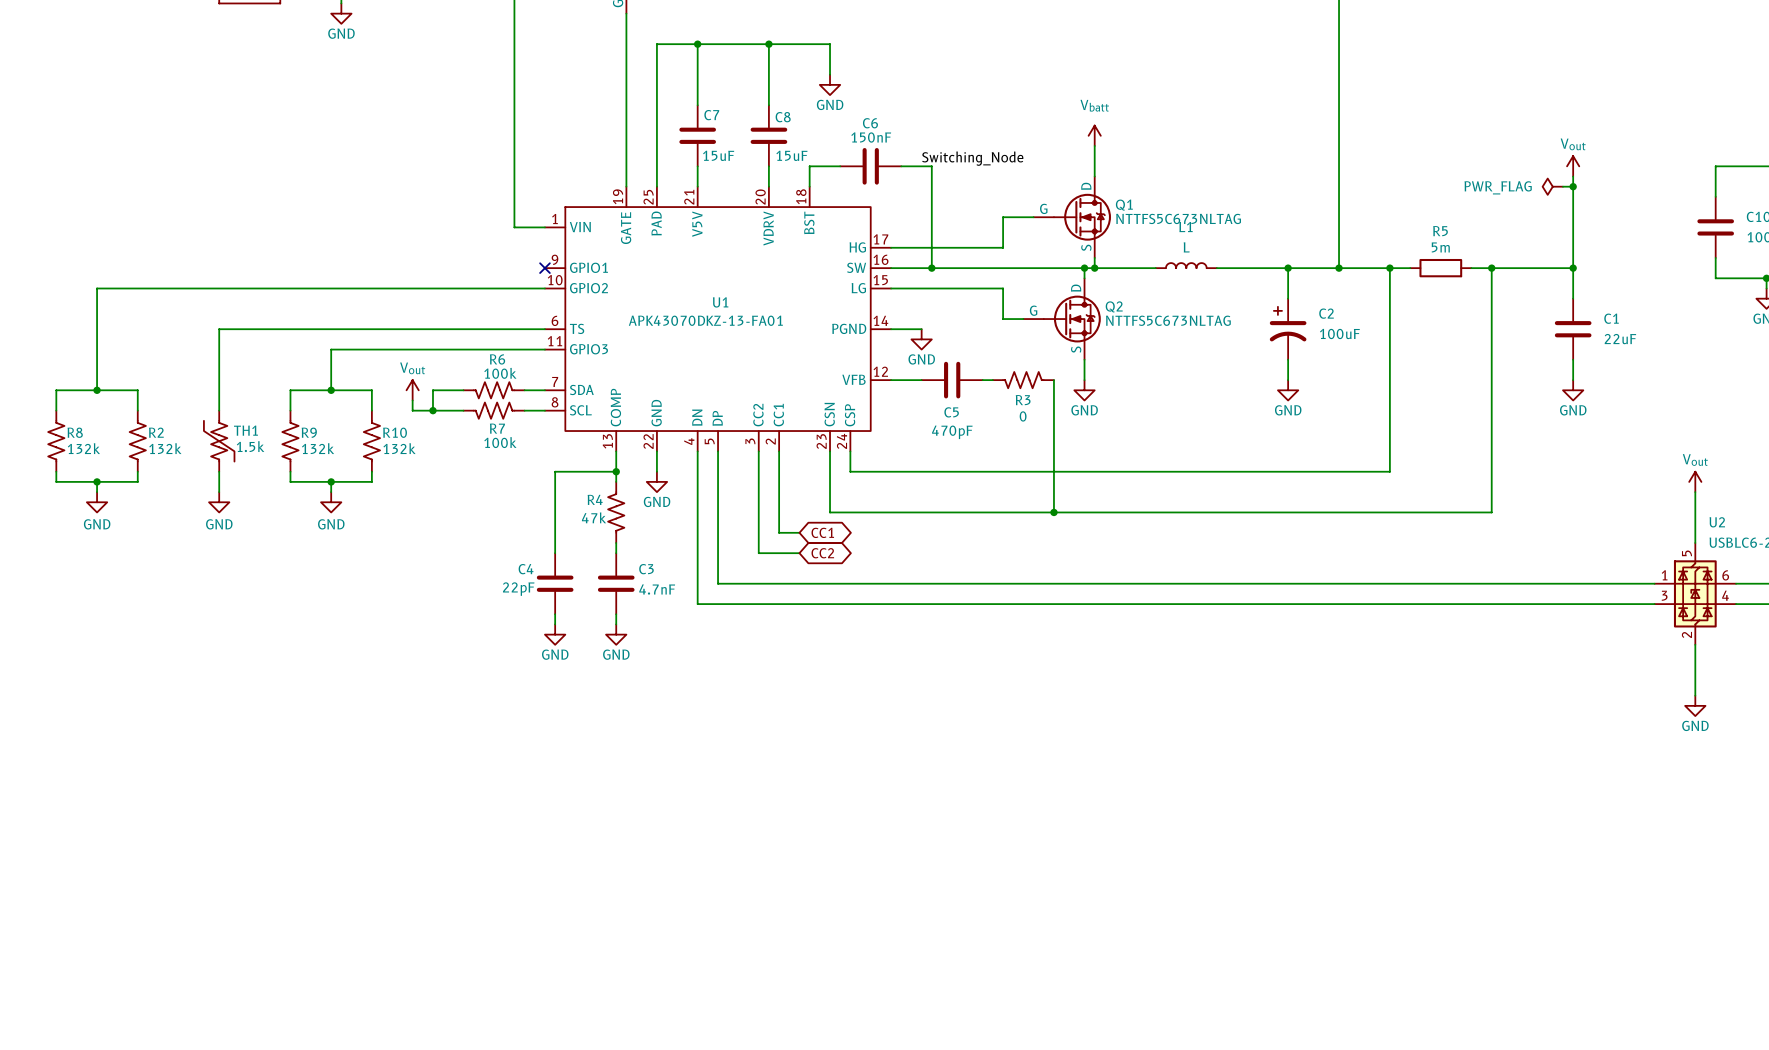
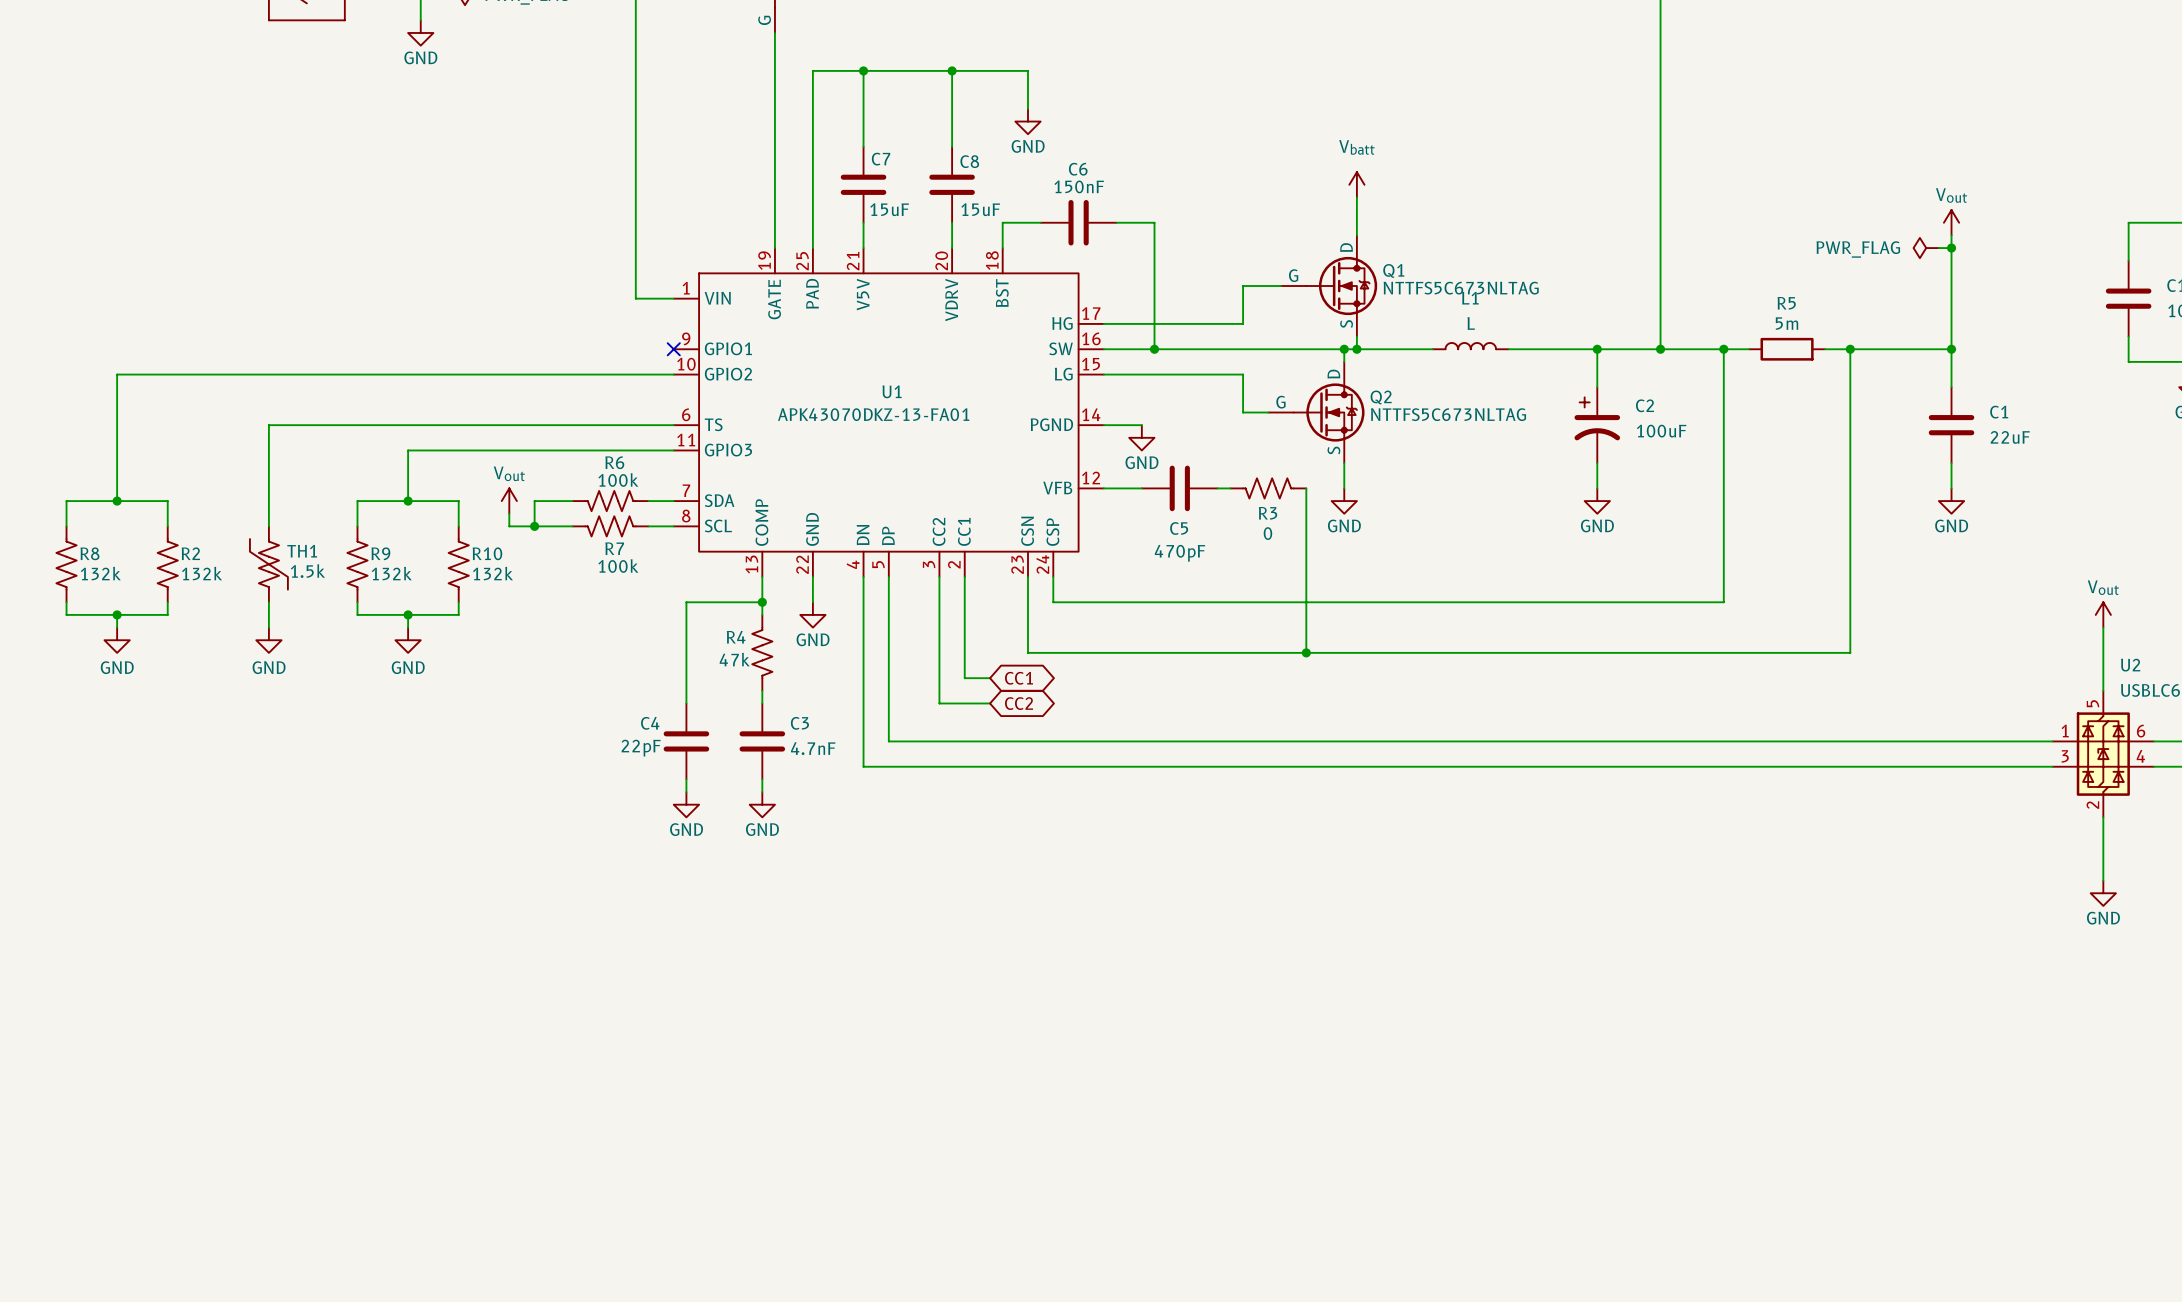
label: Switching_Node (972, 158) -> none

